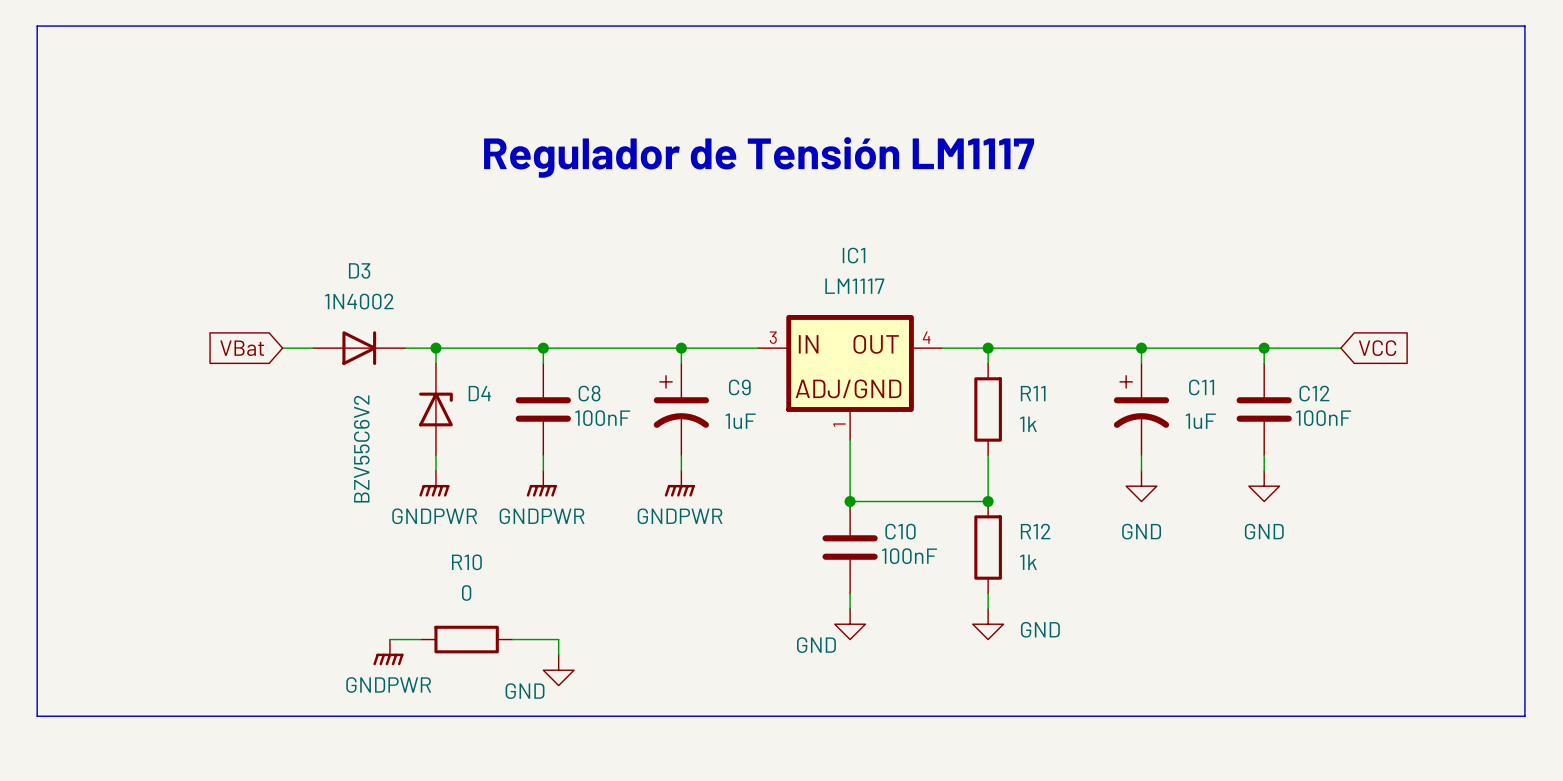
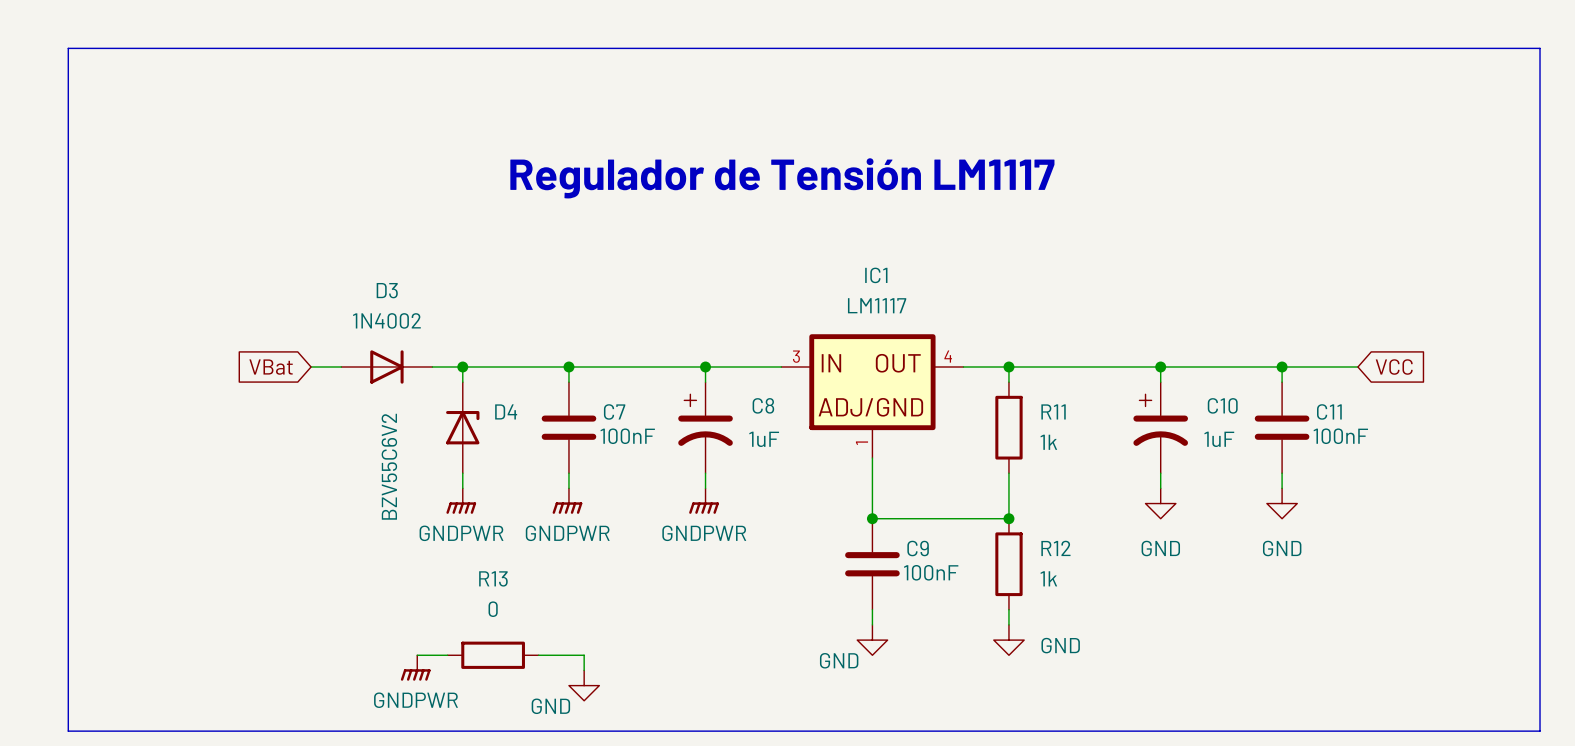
C9 name: C9 (739, 387) -> C8 (763, 405)
C11 name: C11 (1201, 387) -> C10 (1222, 405)
C8 name: C8 (589, 393) -> C7 (614, 411)
C12 name: C12 (1314, 393) -> C11 (1329, 411)
C10 name: C10 (900, 531) -> C9 (918, 548)
R10 name: R10 (466, 562) -> R13 (493, 578)

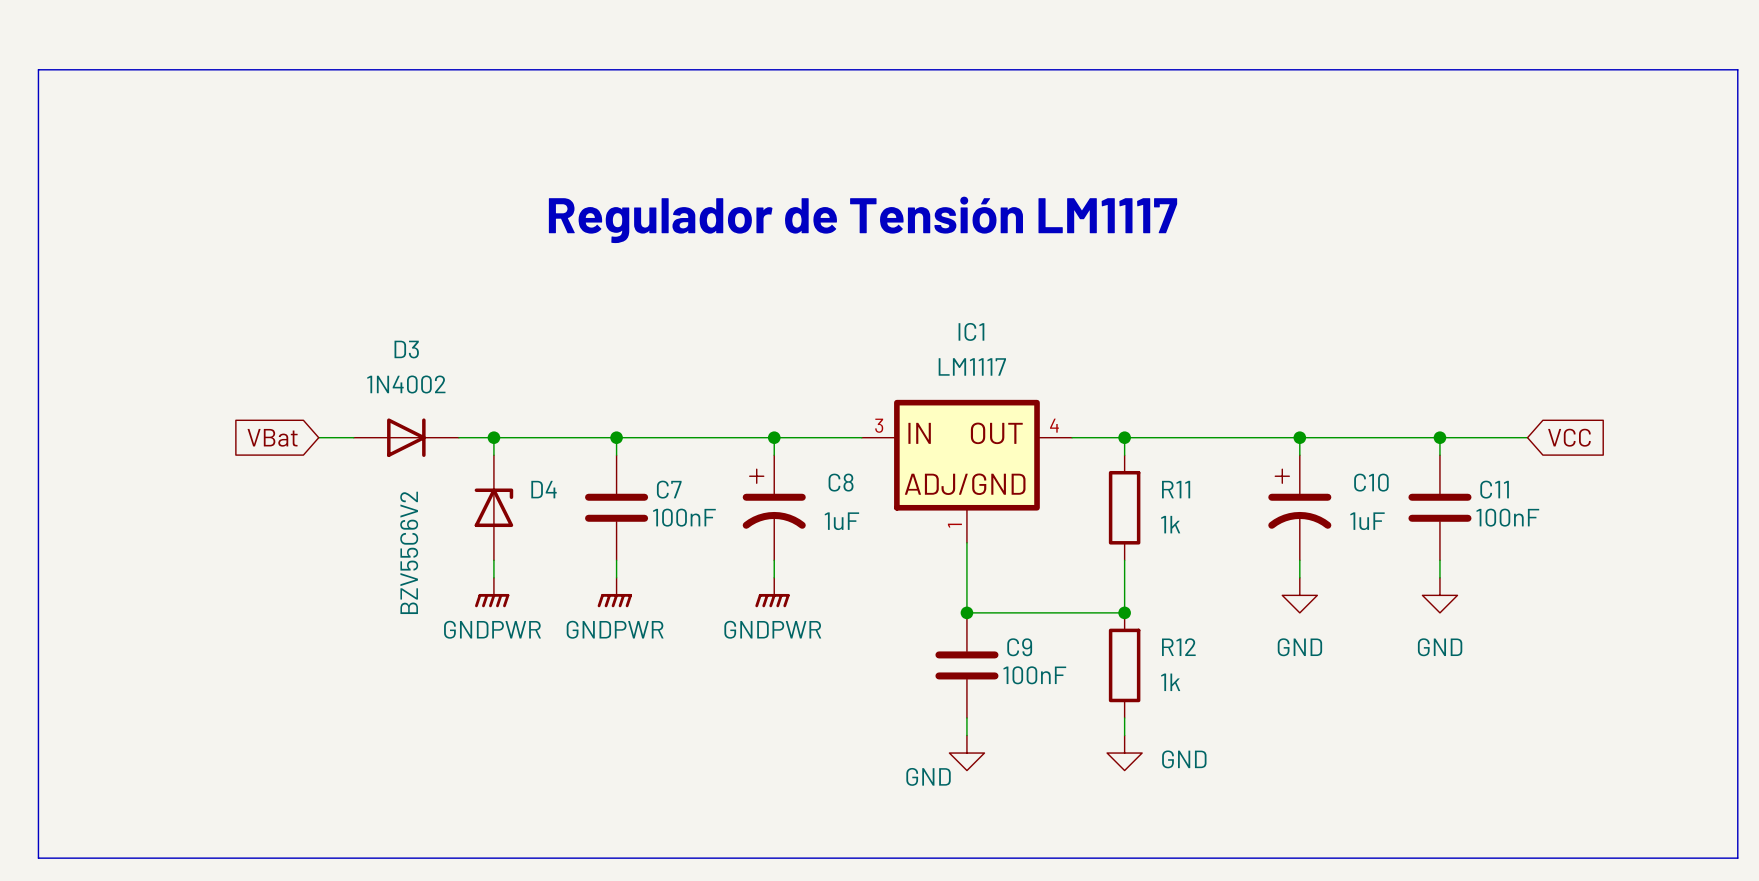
wire: (417, 655) (447, 655) -> none
R13: 0 (493, 655) -> none
wire: (538, 655) (584, 655) (584, 670) -> none
power symbol: GNDPWR (415, 668) -> none
power symbol: GND (584, 685) -> none

